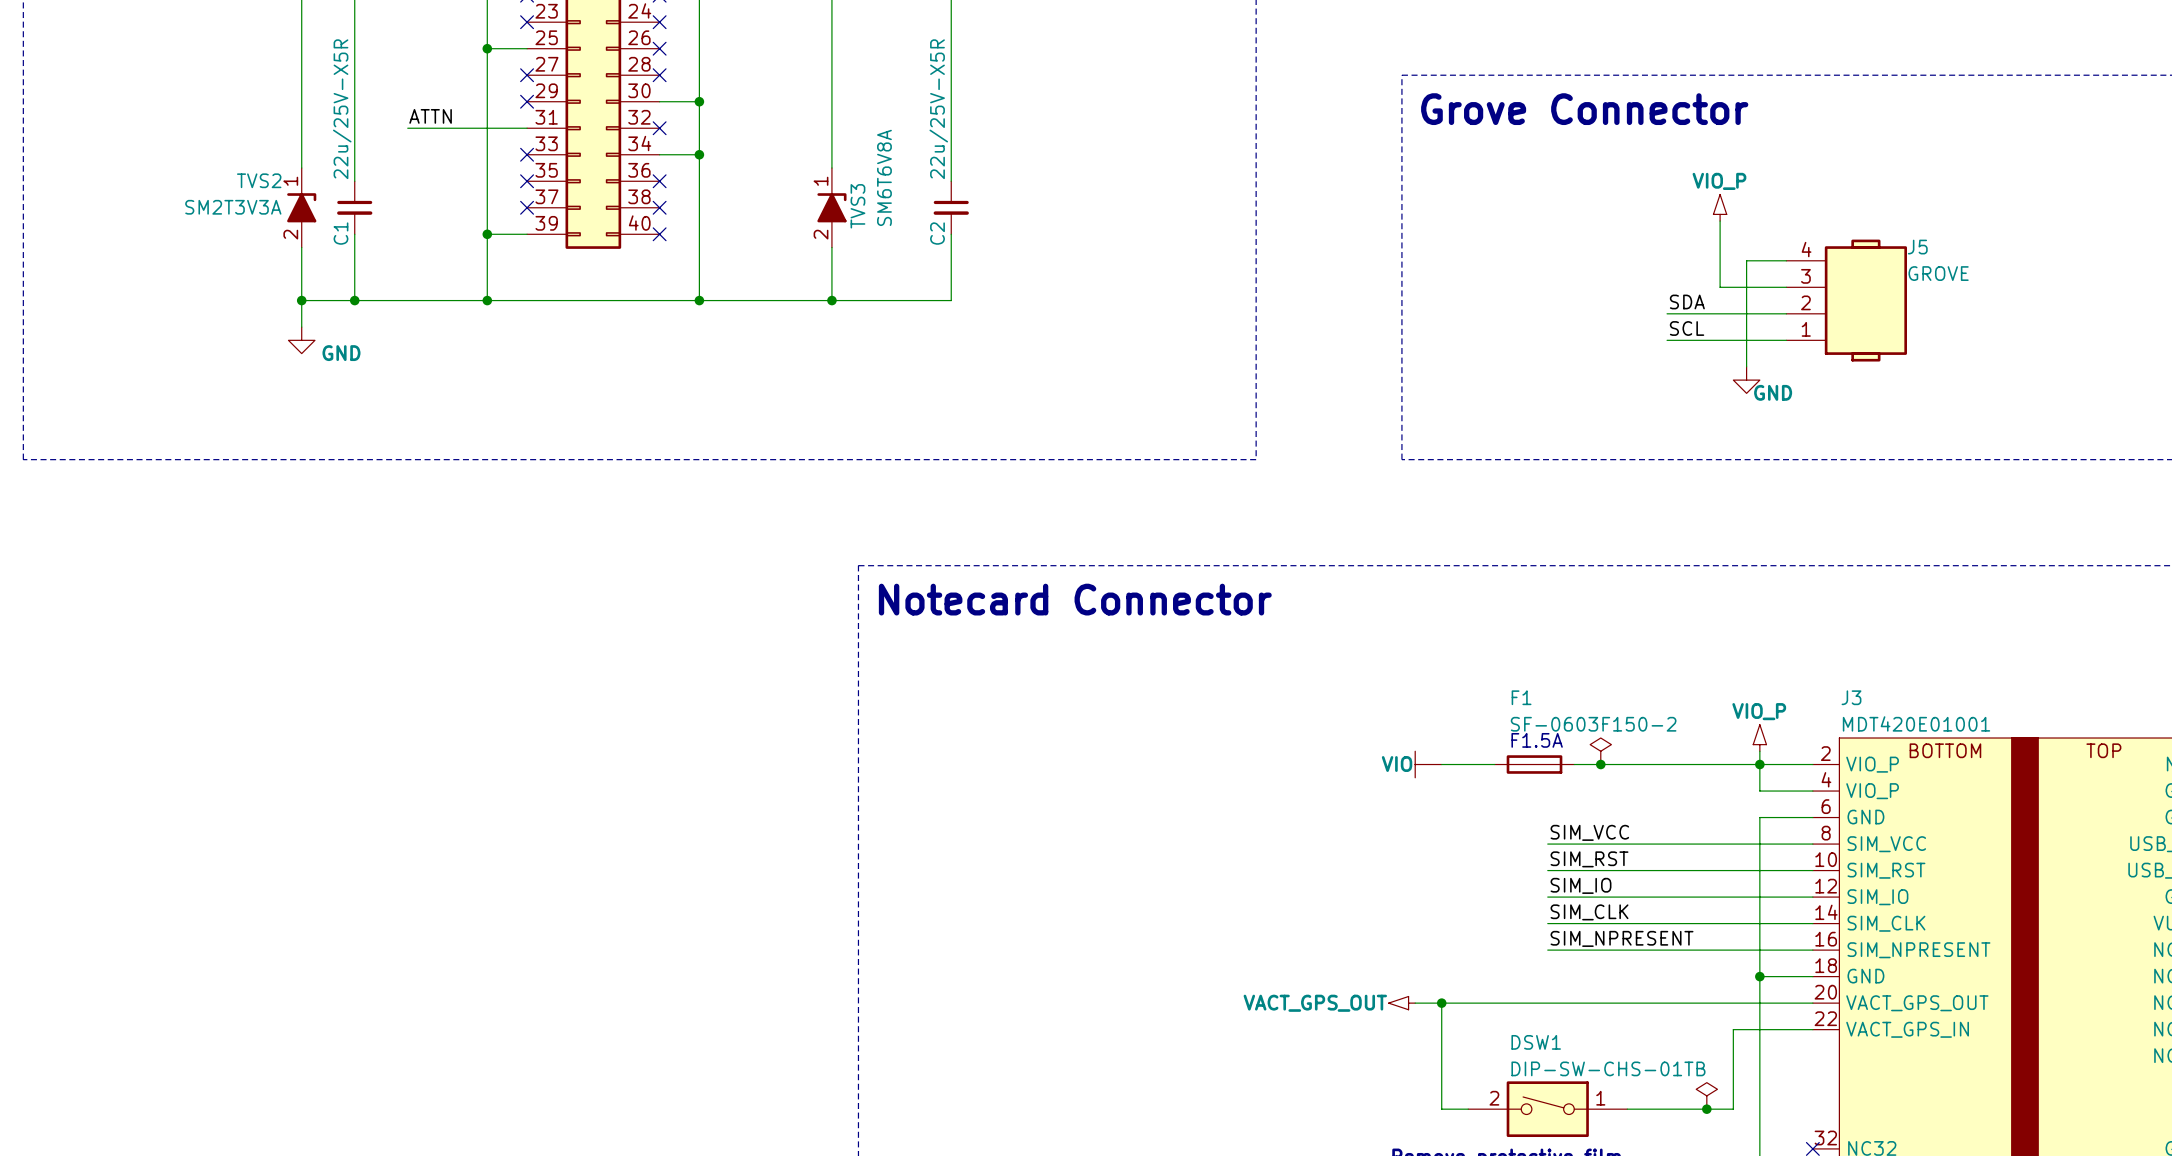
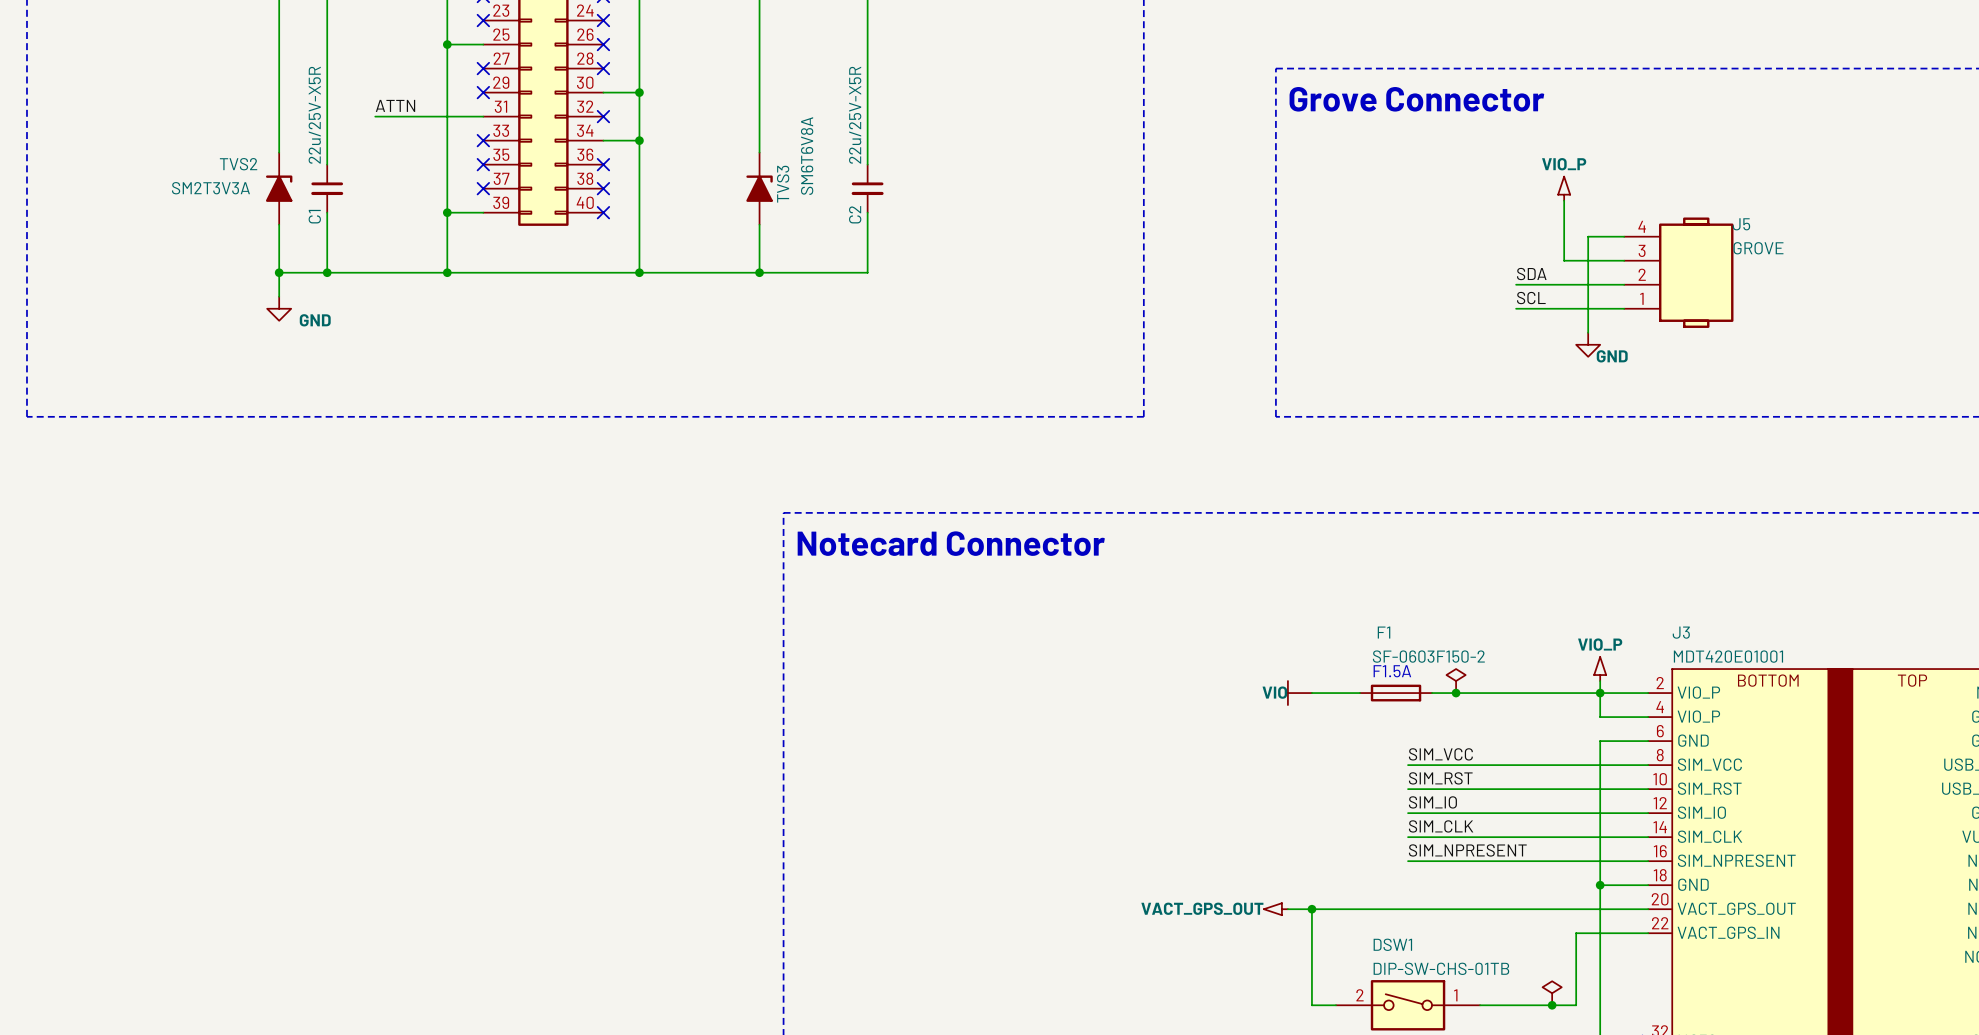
TVS2 pin number: 1 (290, 181) -> none
TVS3 pin number: 1 (821, 181) -> none
TVS2 pin number: 2 (290, 234) -> none
TVS3 pin number: 2 (821, 234) -> none

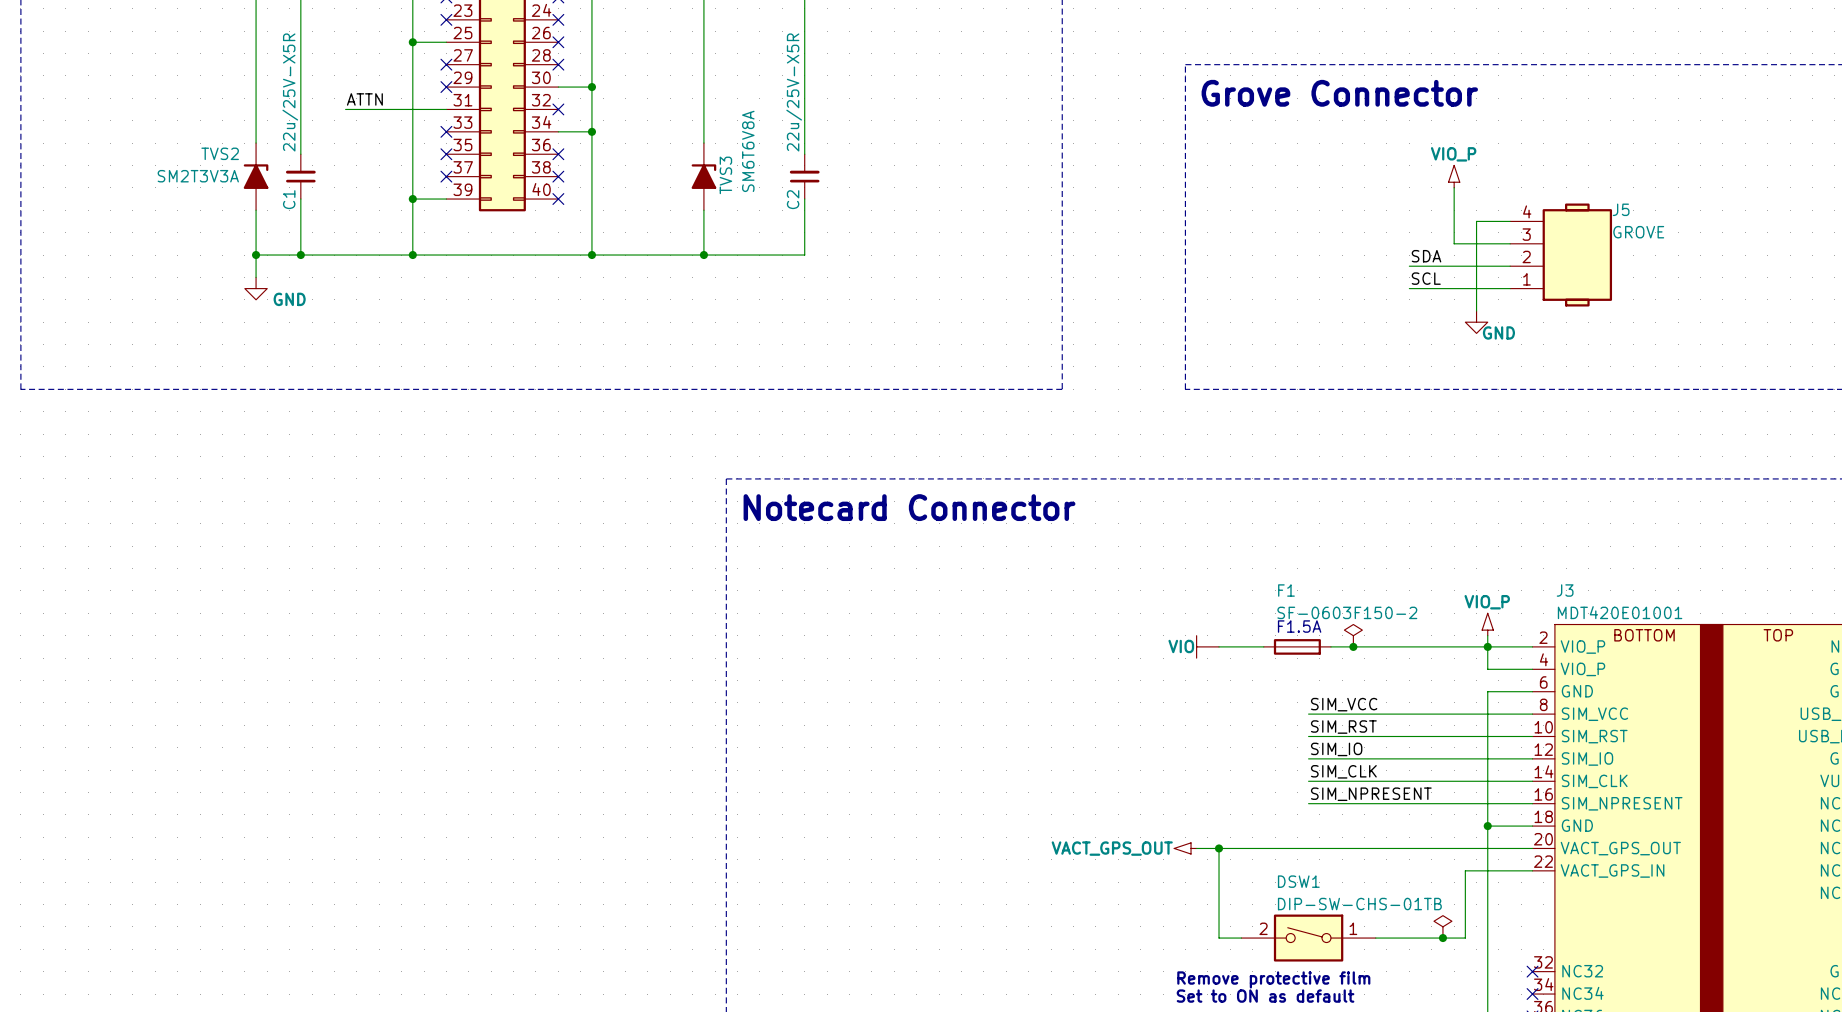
C1 rotation: 0° (327, 188) -> 180° (300, 176)
C2 rotation: 0° (867, 188) -> 180° (804, 176)

